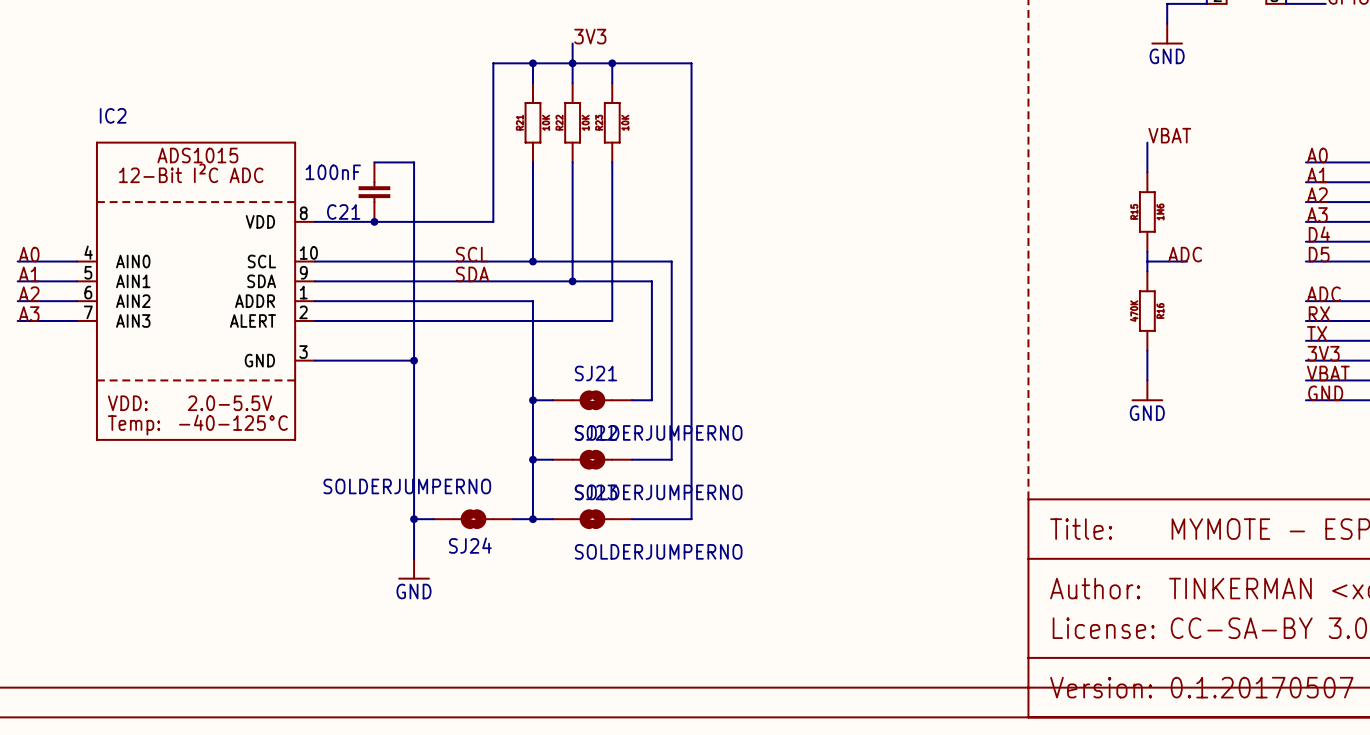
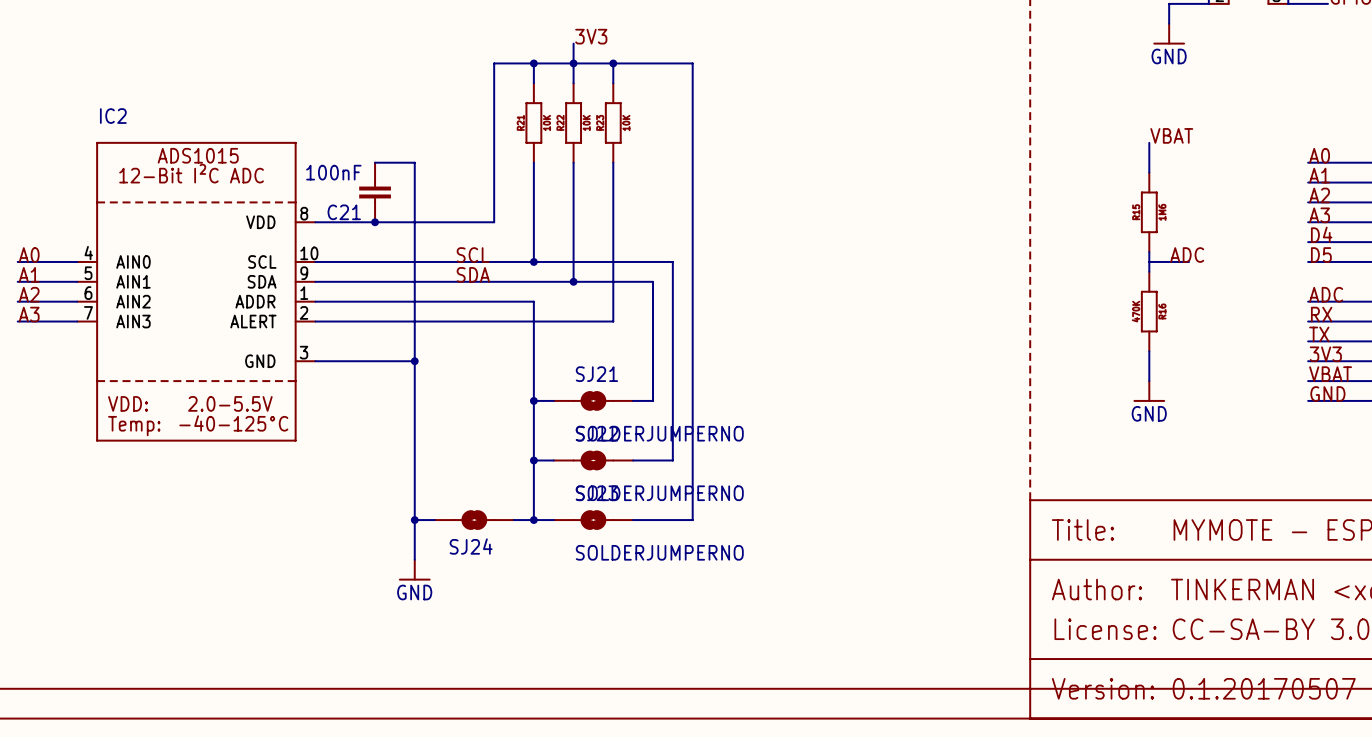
SJ24 value: SOLDERJUMPERNO (407, 486) -> none

